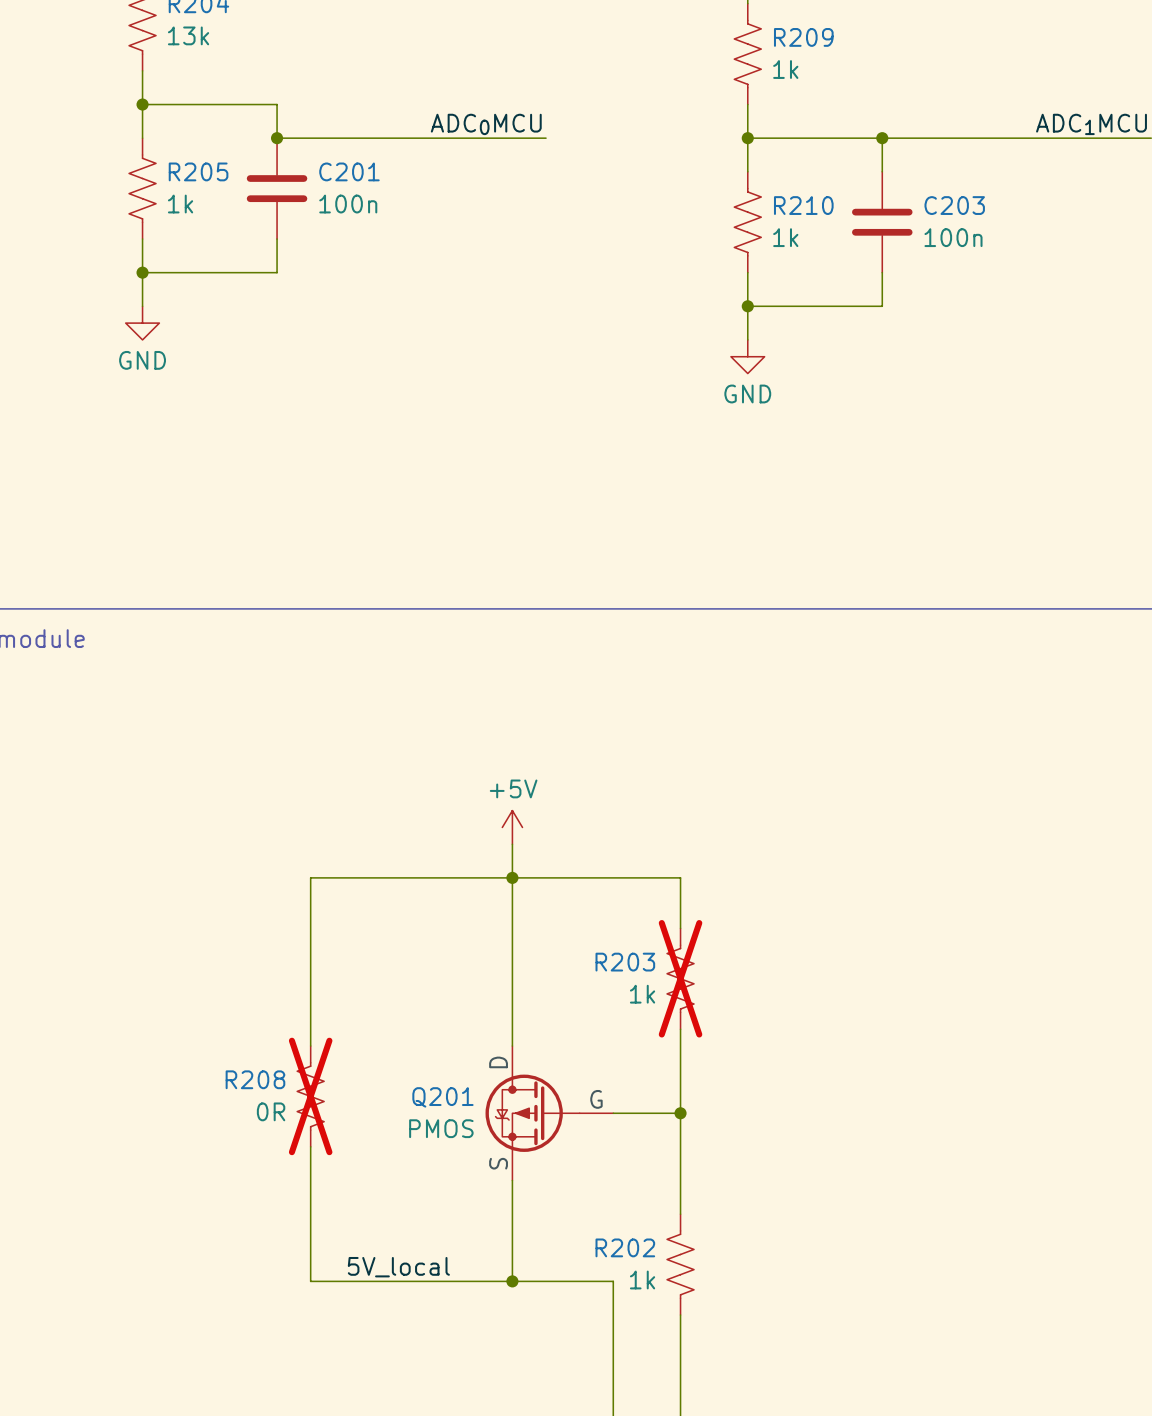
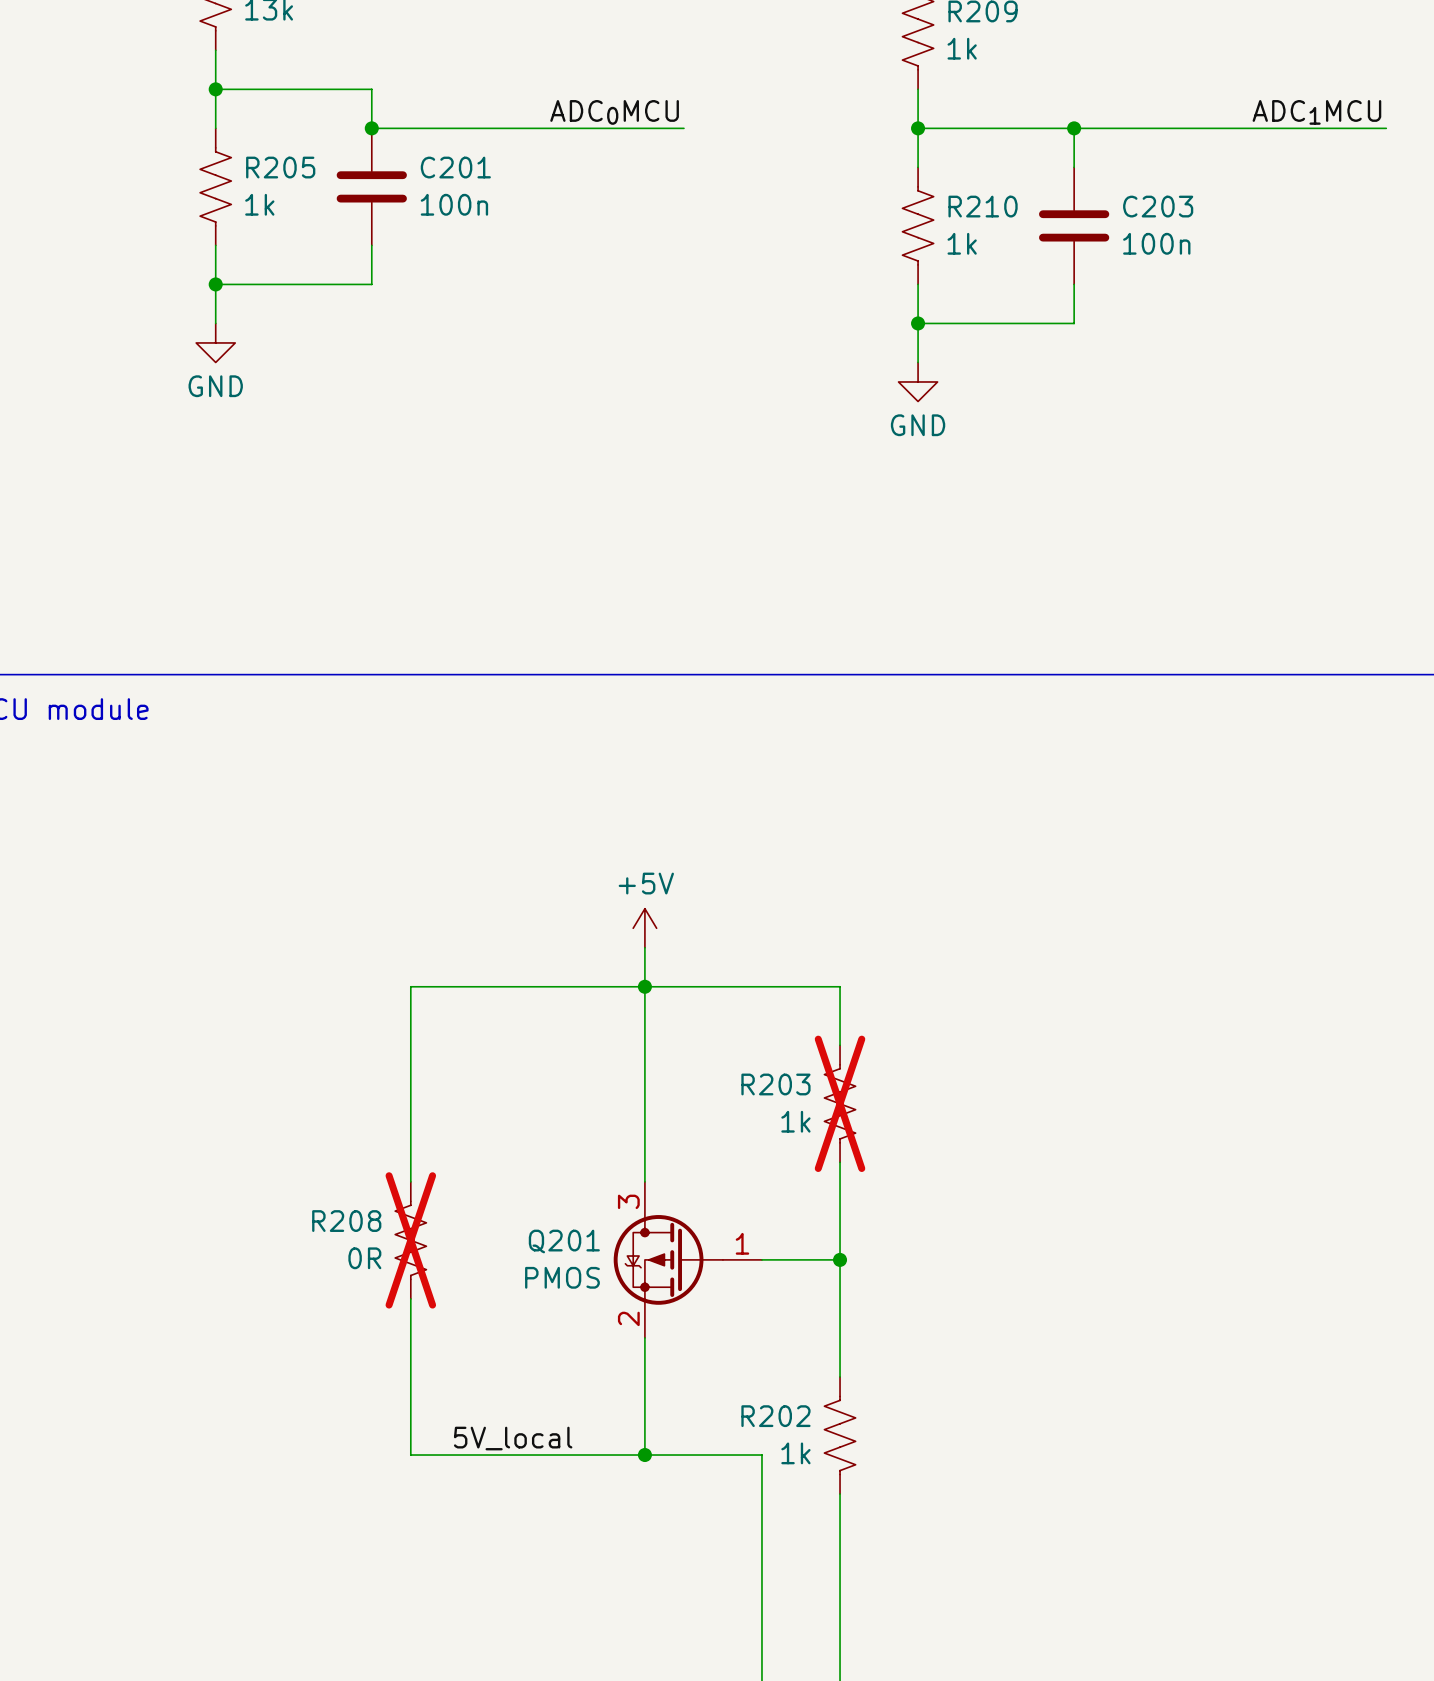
Q201 pin name: D (498, 1062) -> none
Q201 pin number: none -> 3 (628, 1201)
Q201 pin name: G (596, 1099) -> none
Q201 pin number: none -> 1 (742, 1243)
Q201 pin name: S (498, 1163) -> none
Q201 pin number: none -> 2 (628, 1318)

